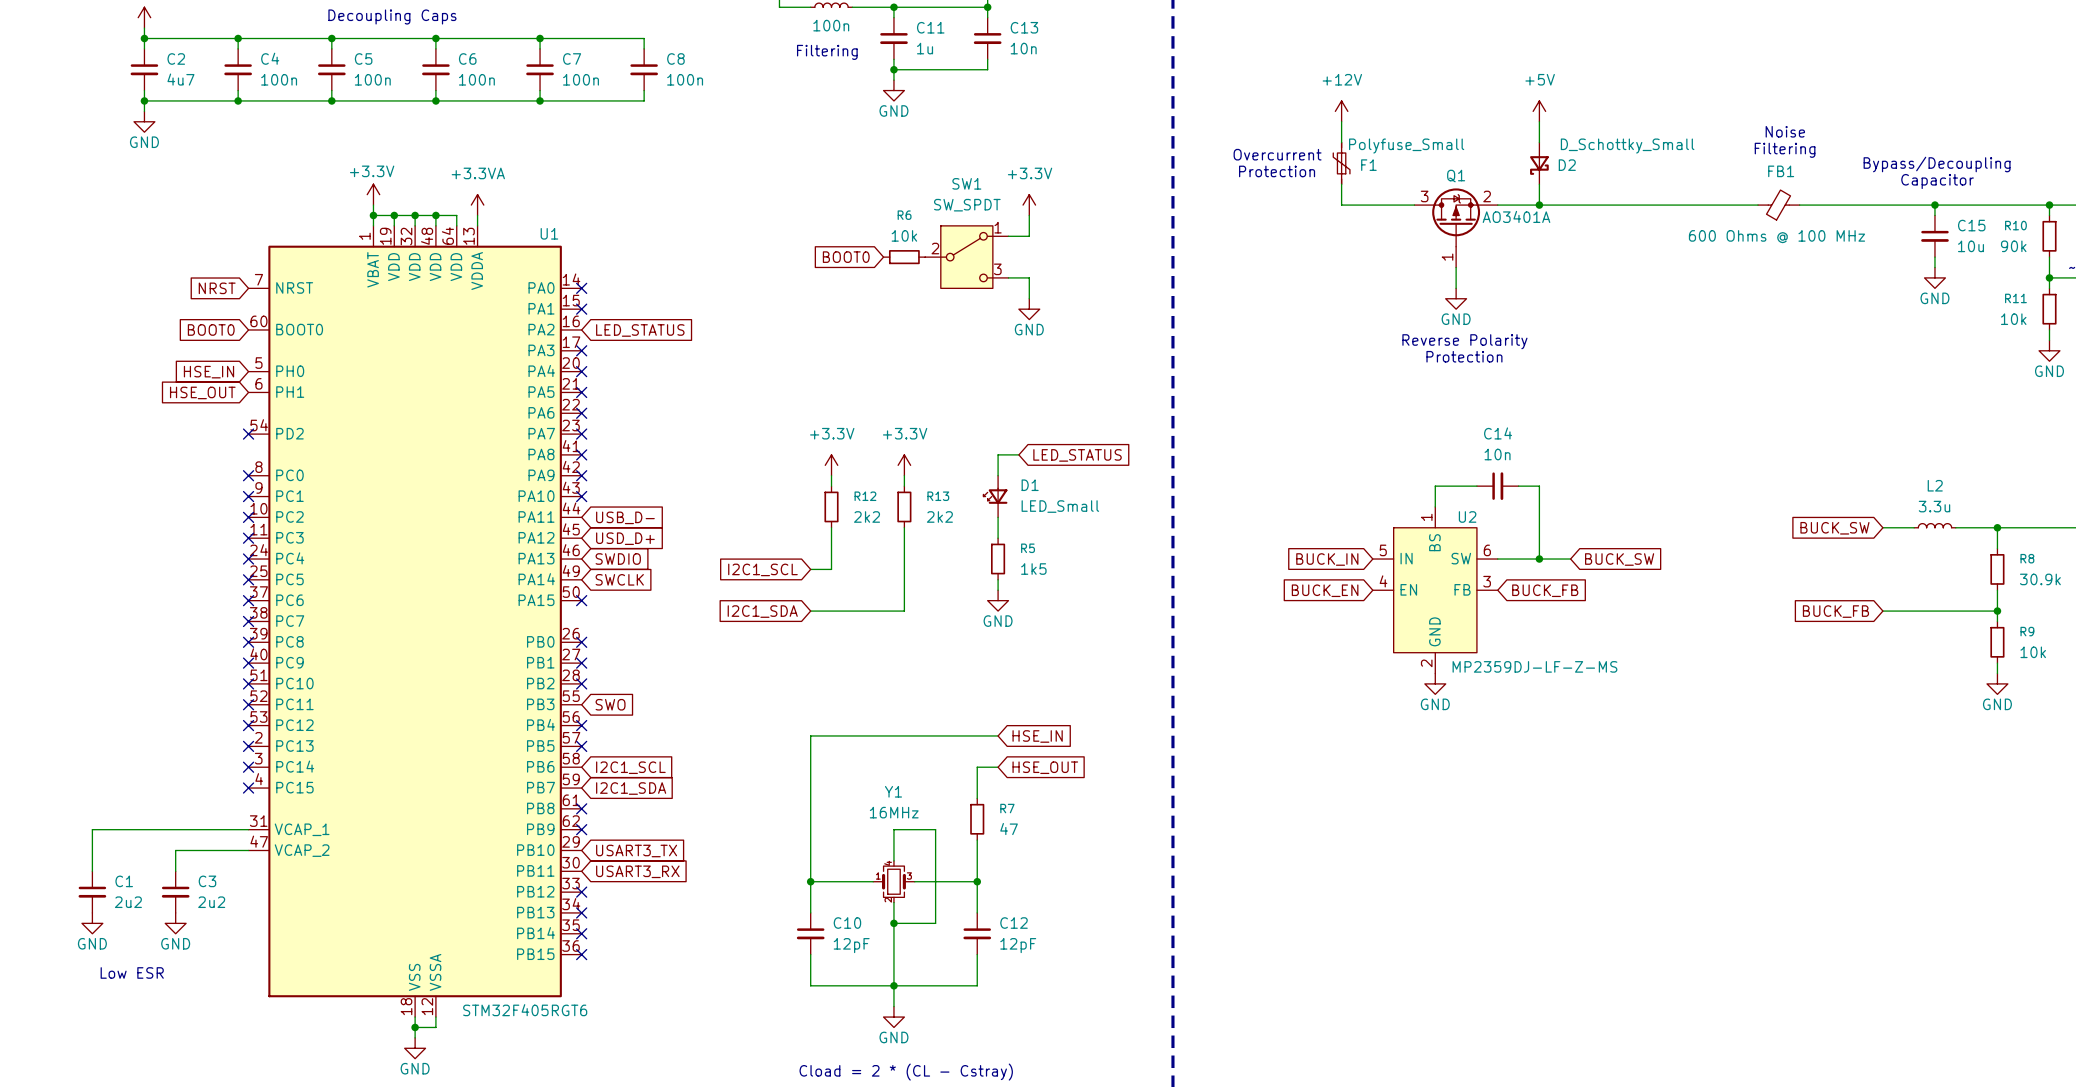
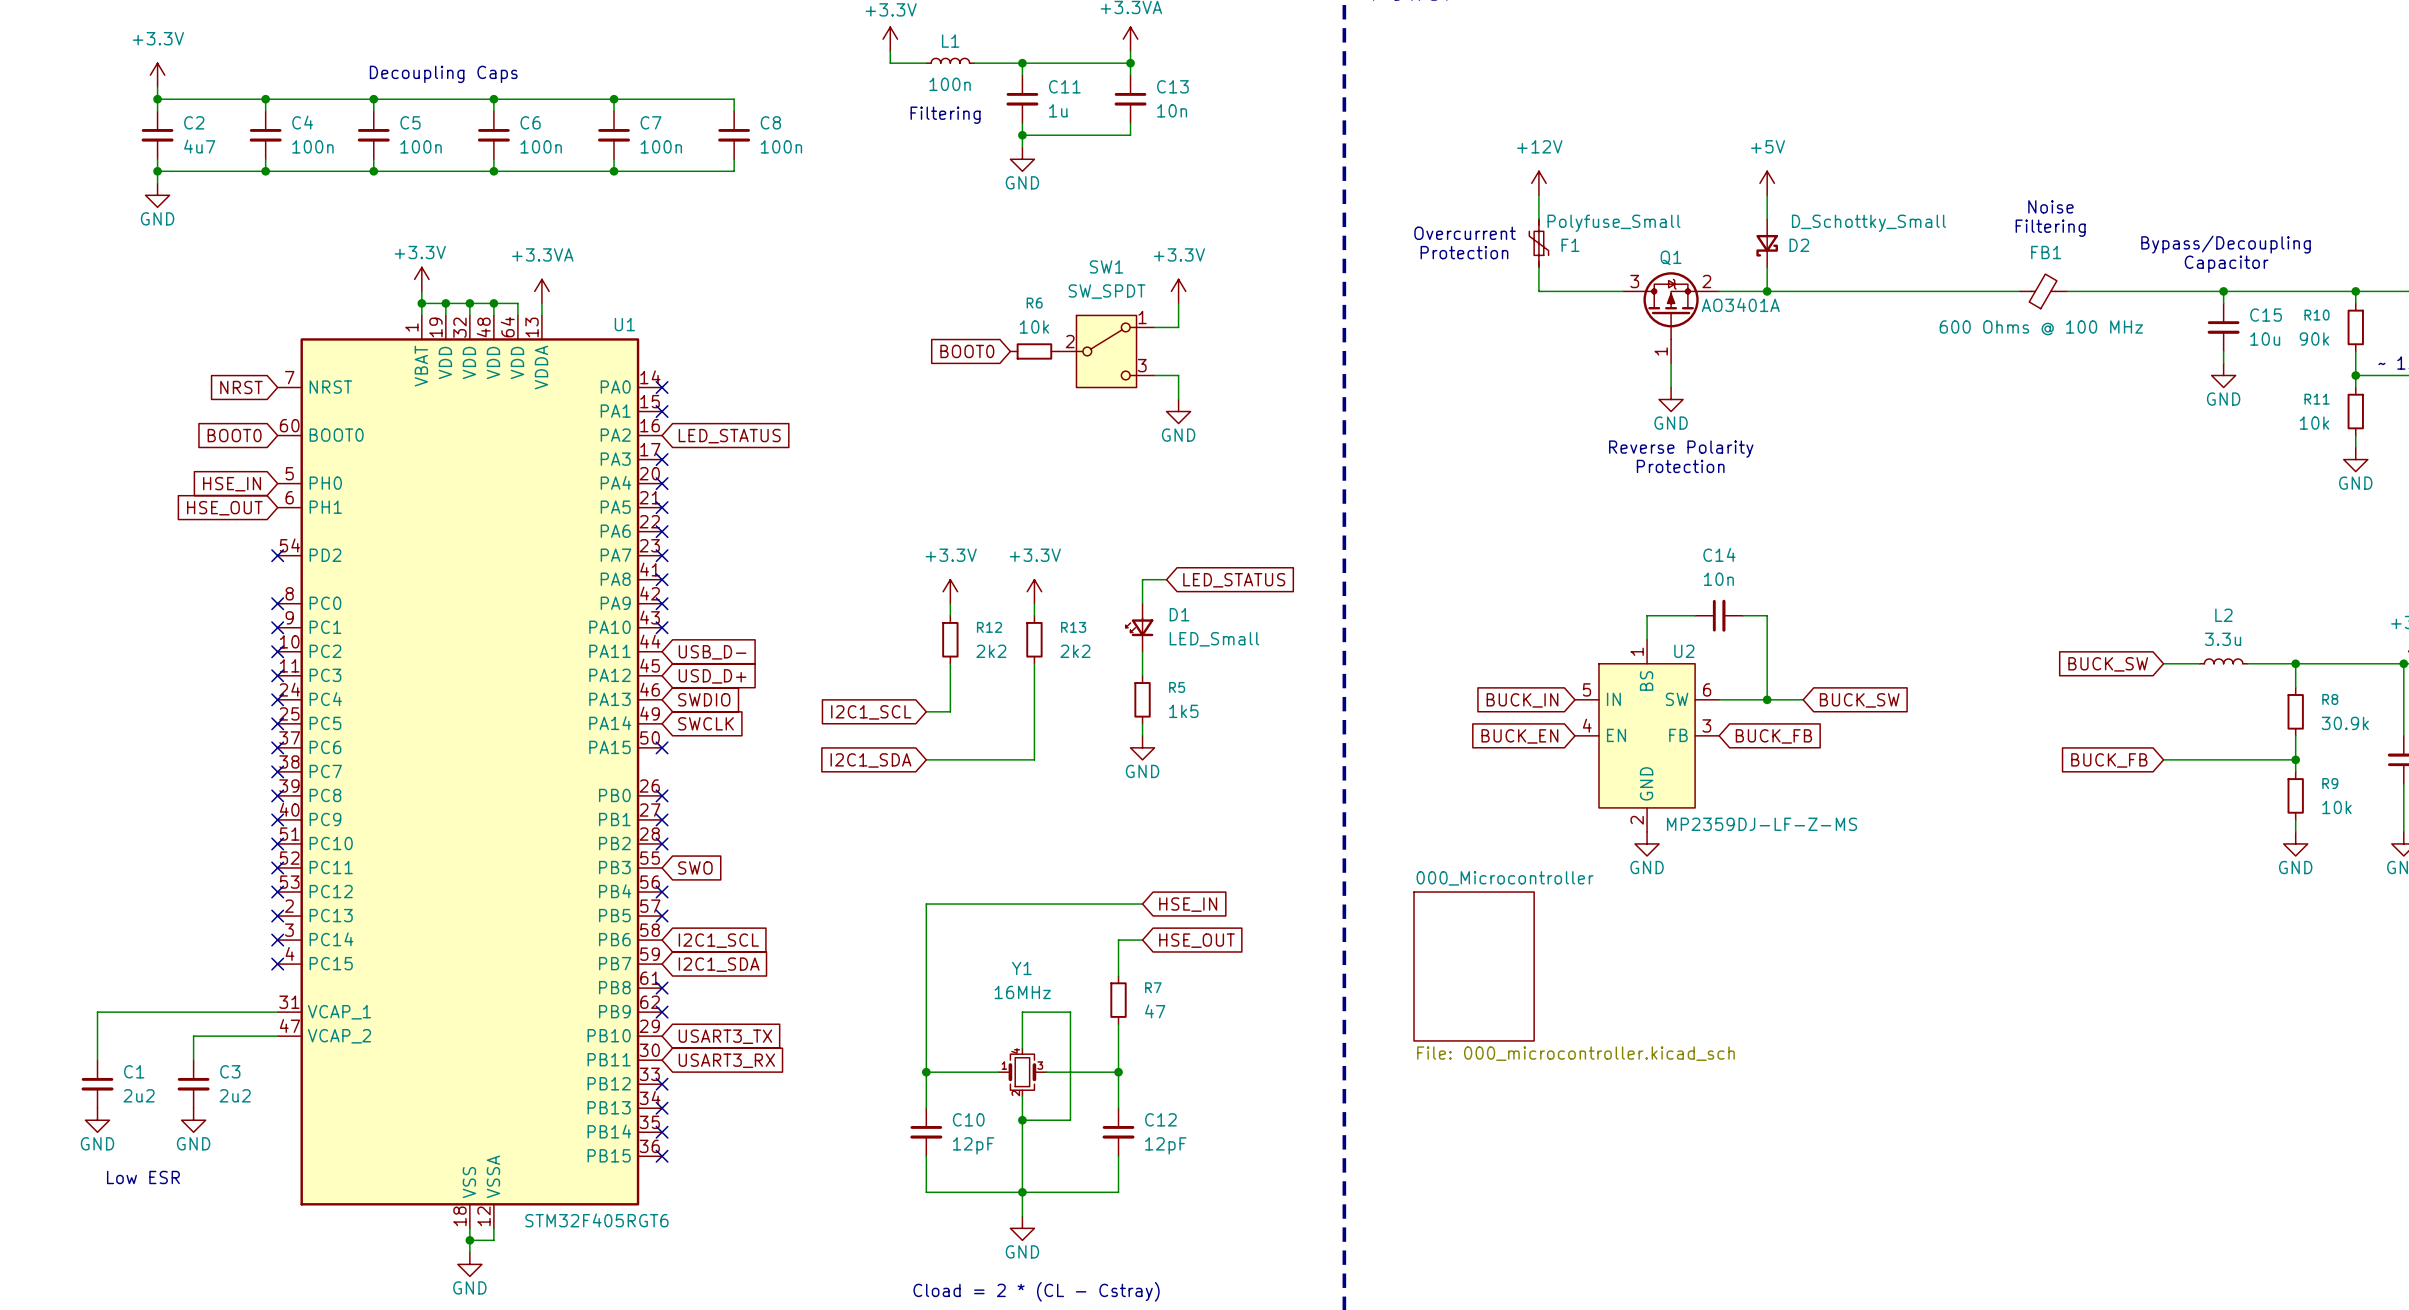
sheet 000_Microcontroller: none -> File: 000_microcontroller.kicad_sch (1474, 966)

